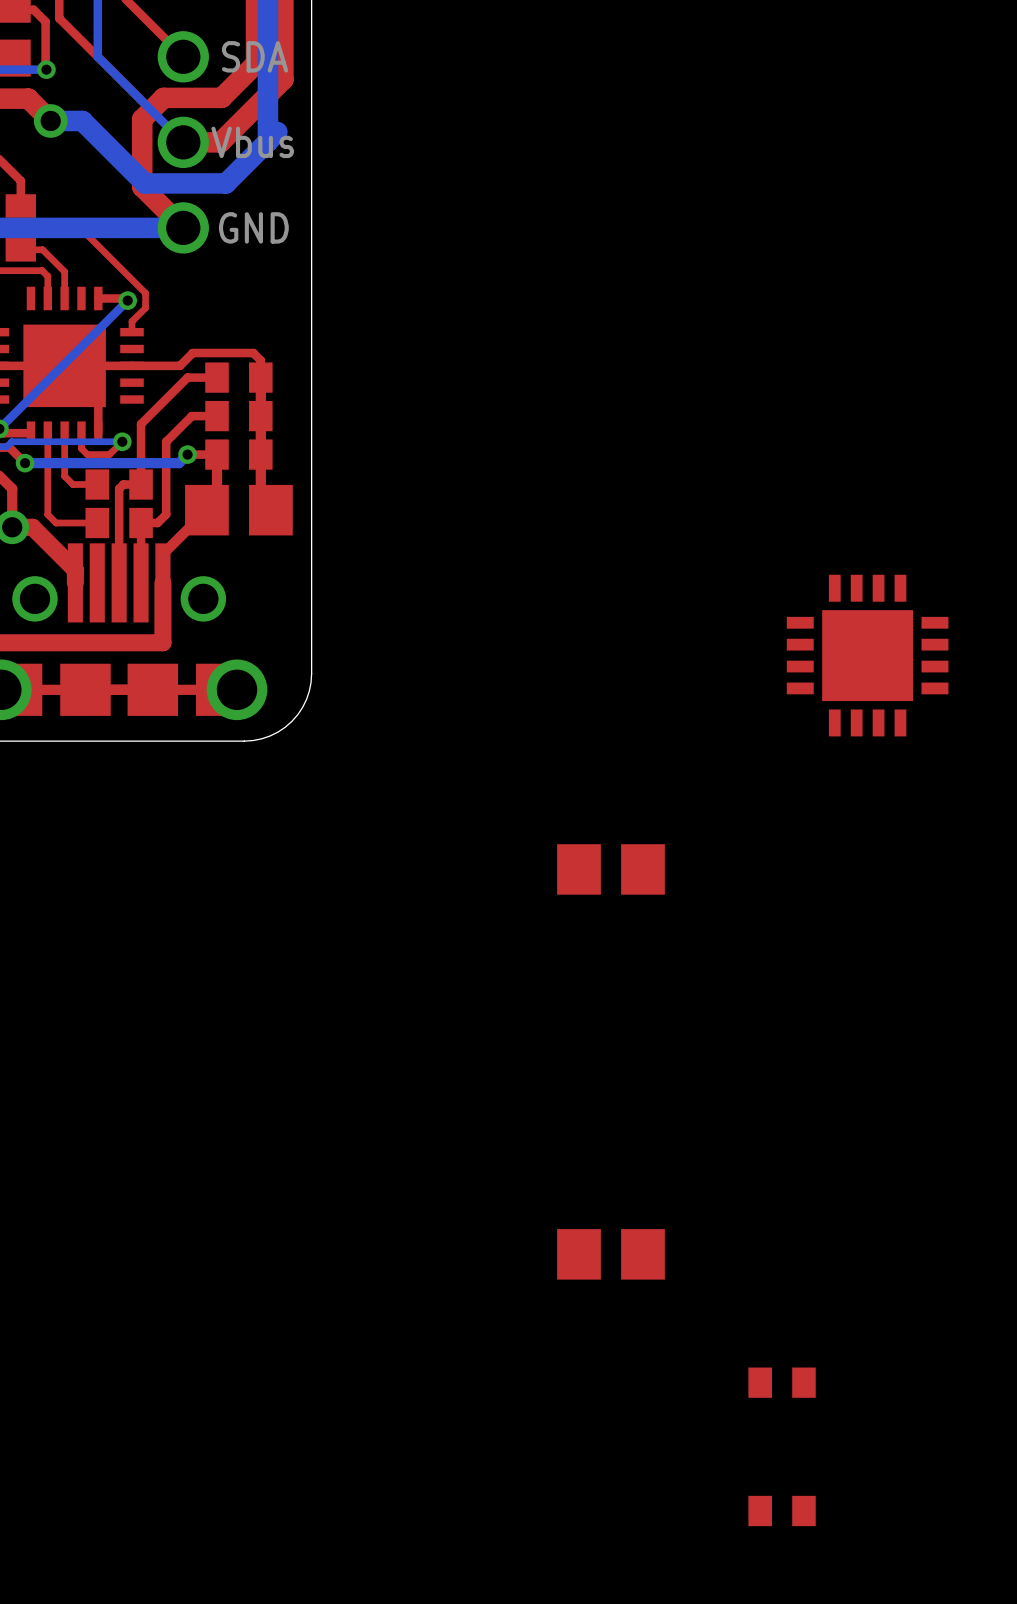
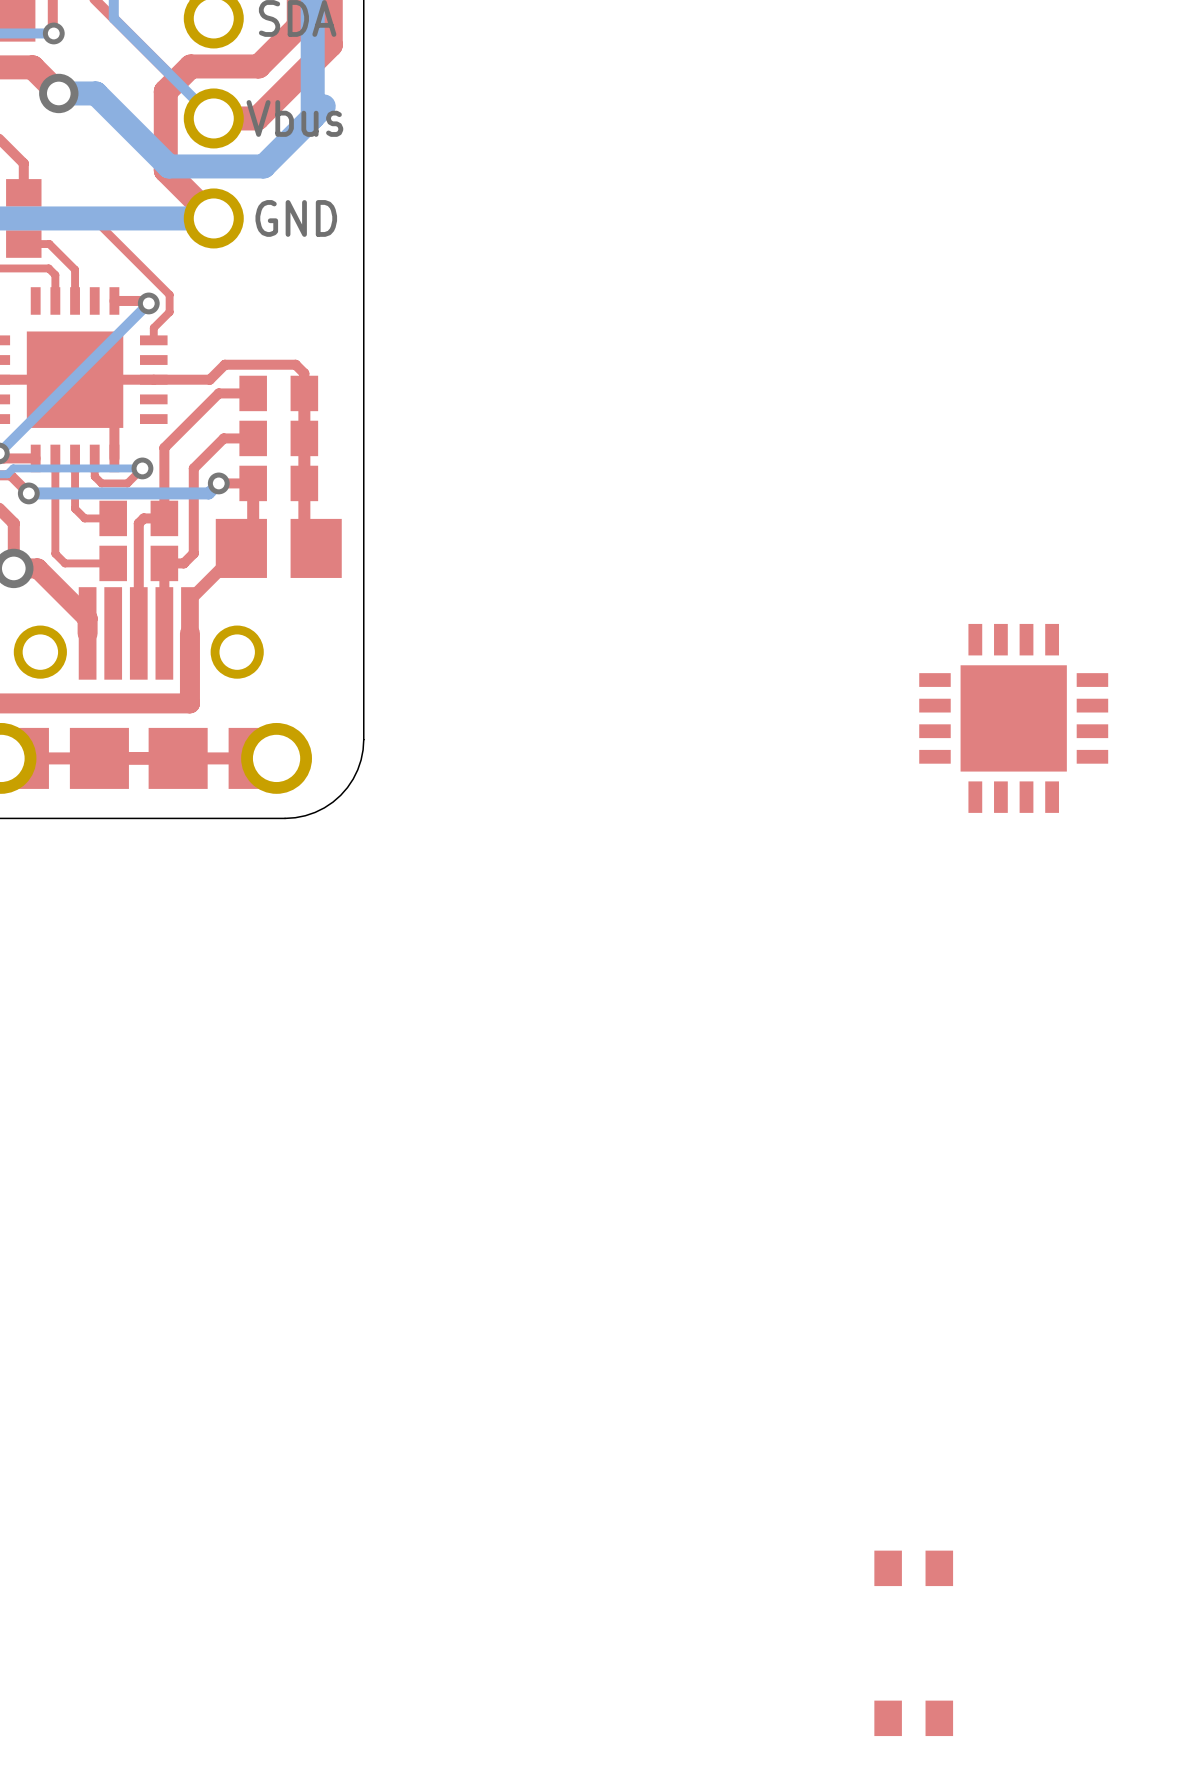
part: (611, 869) -> none
part: (611, 1254) -> none

